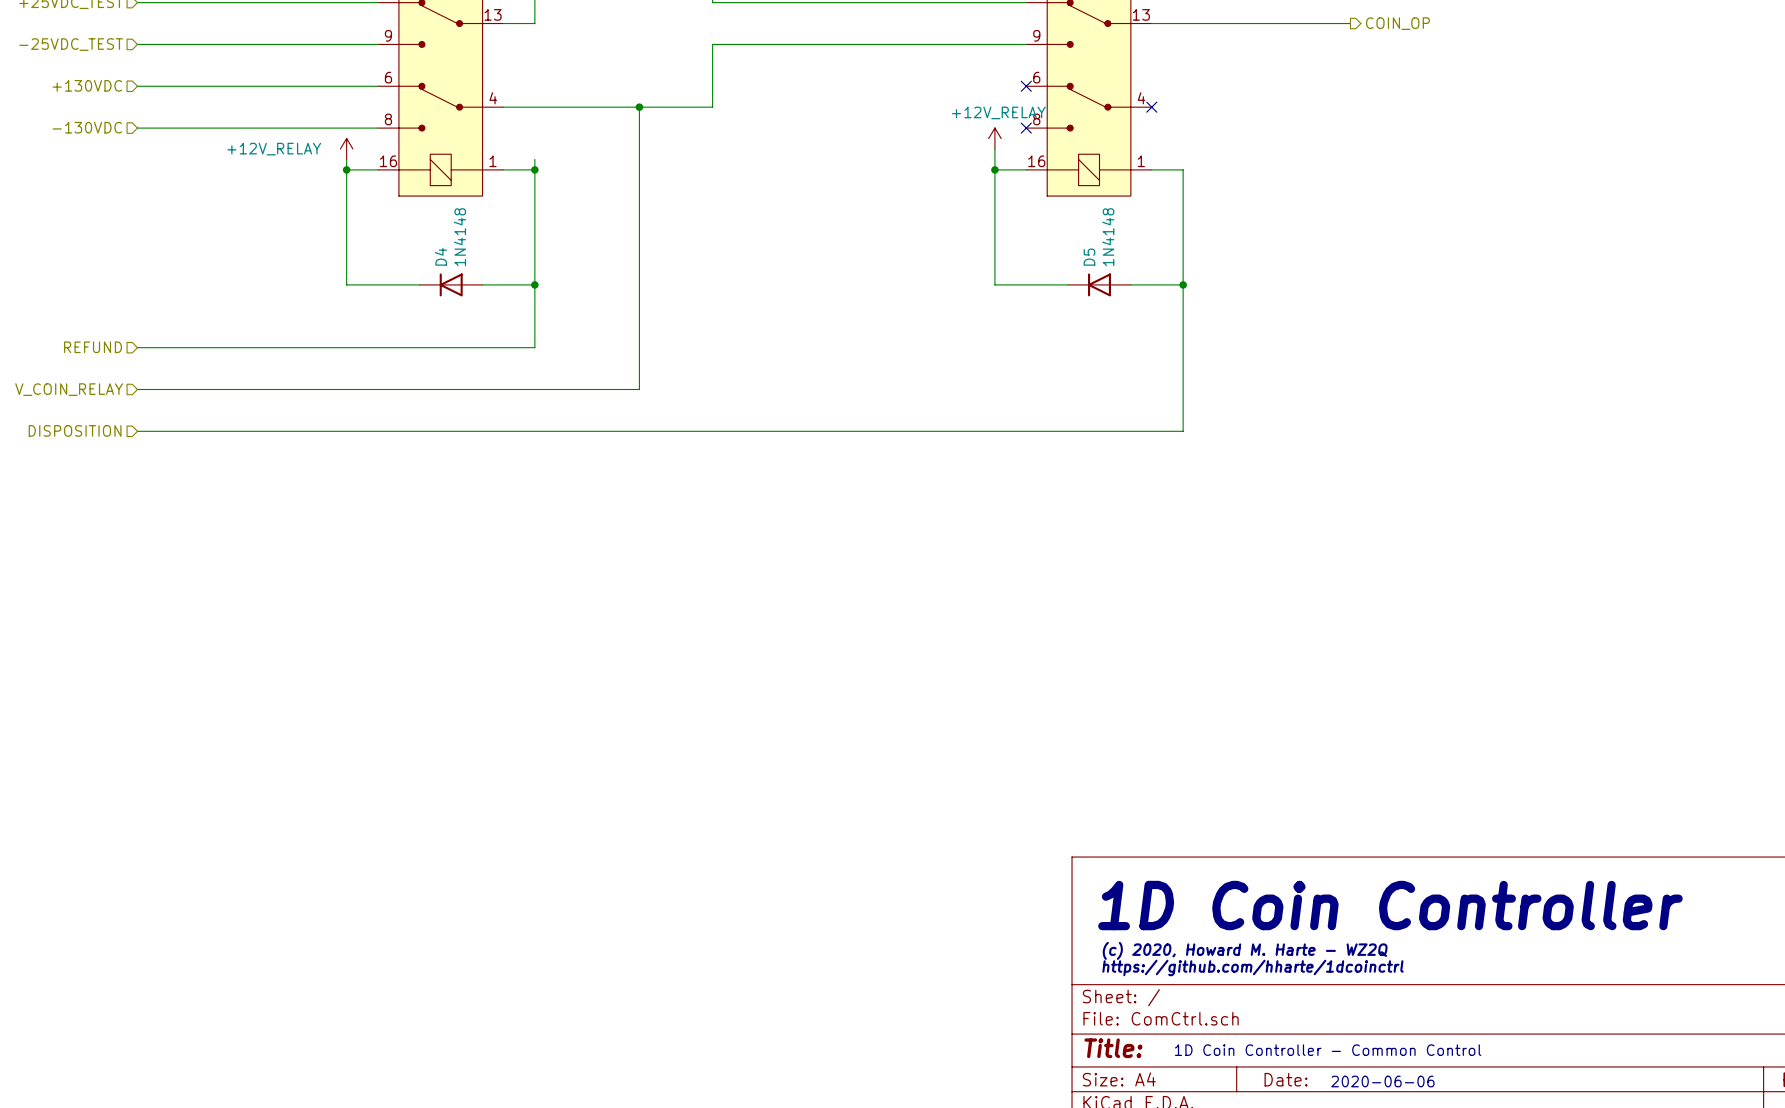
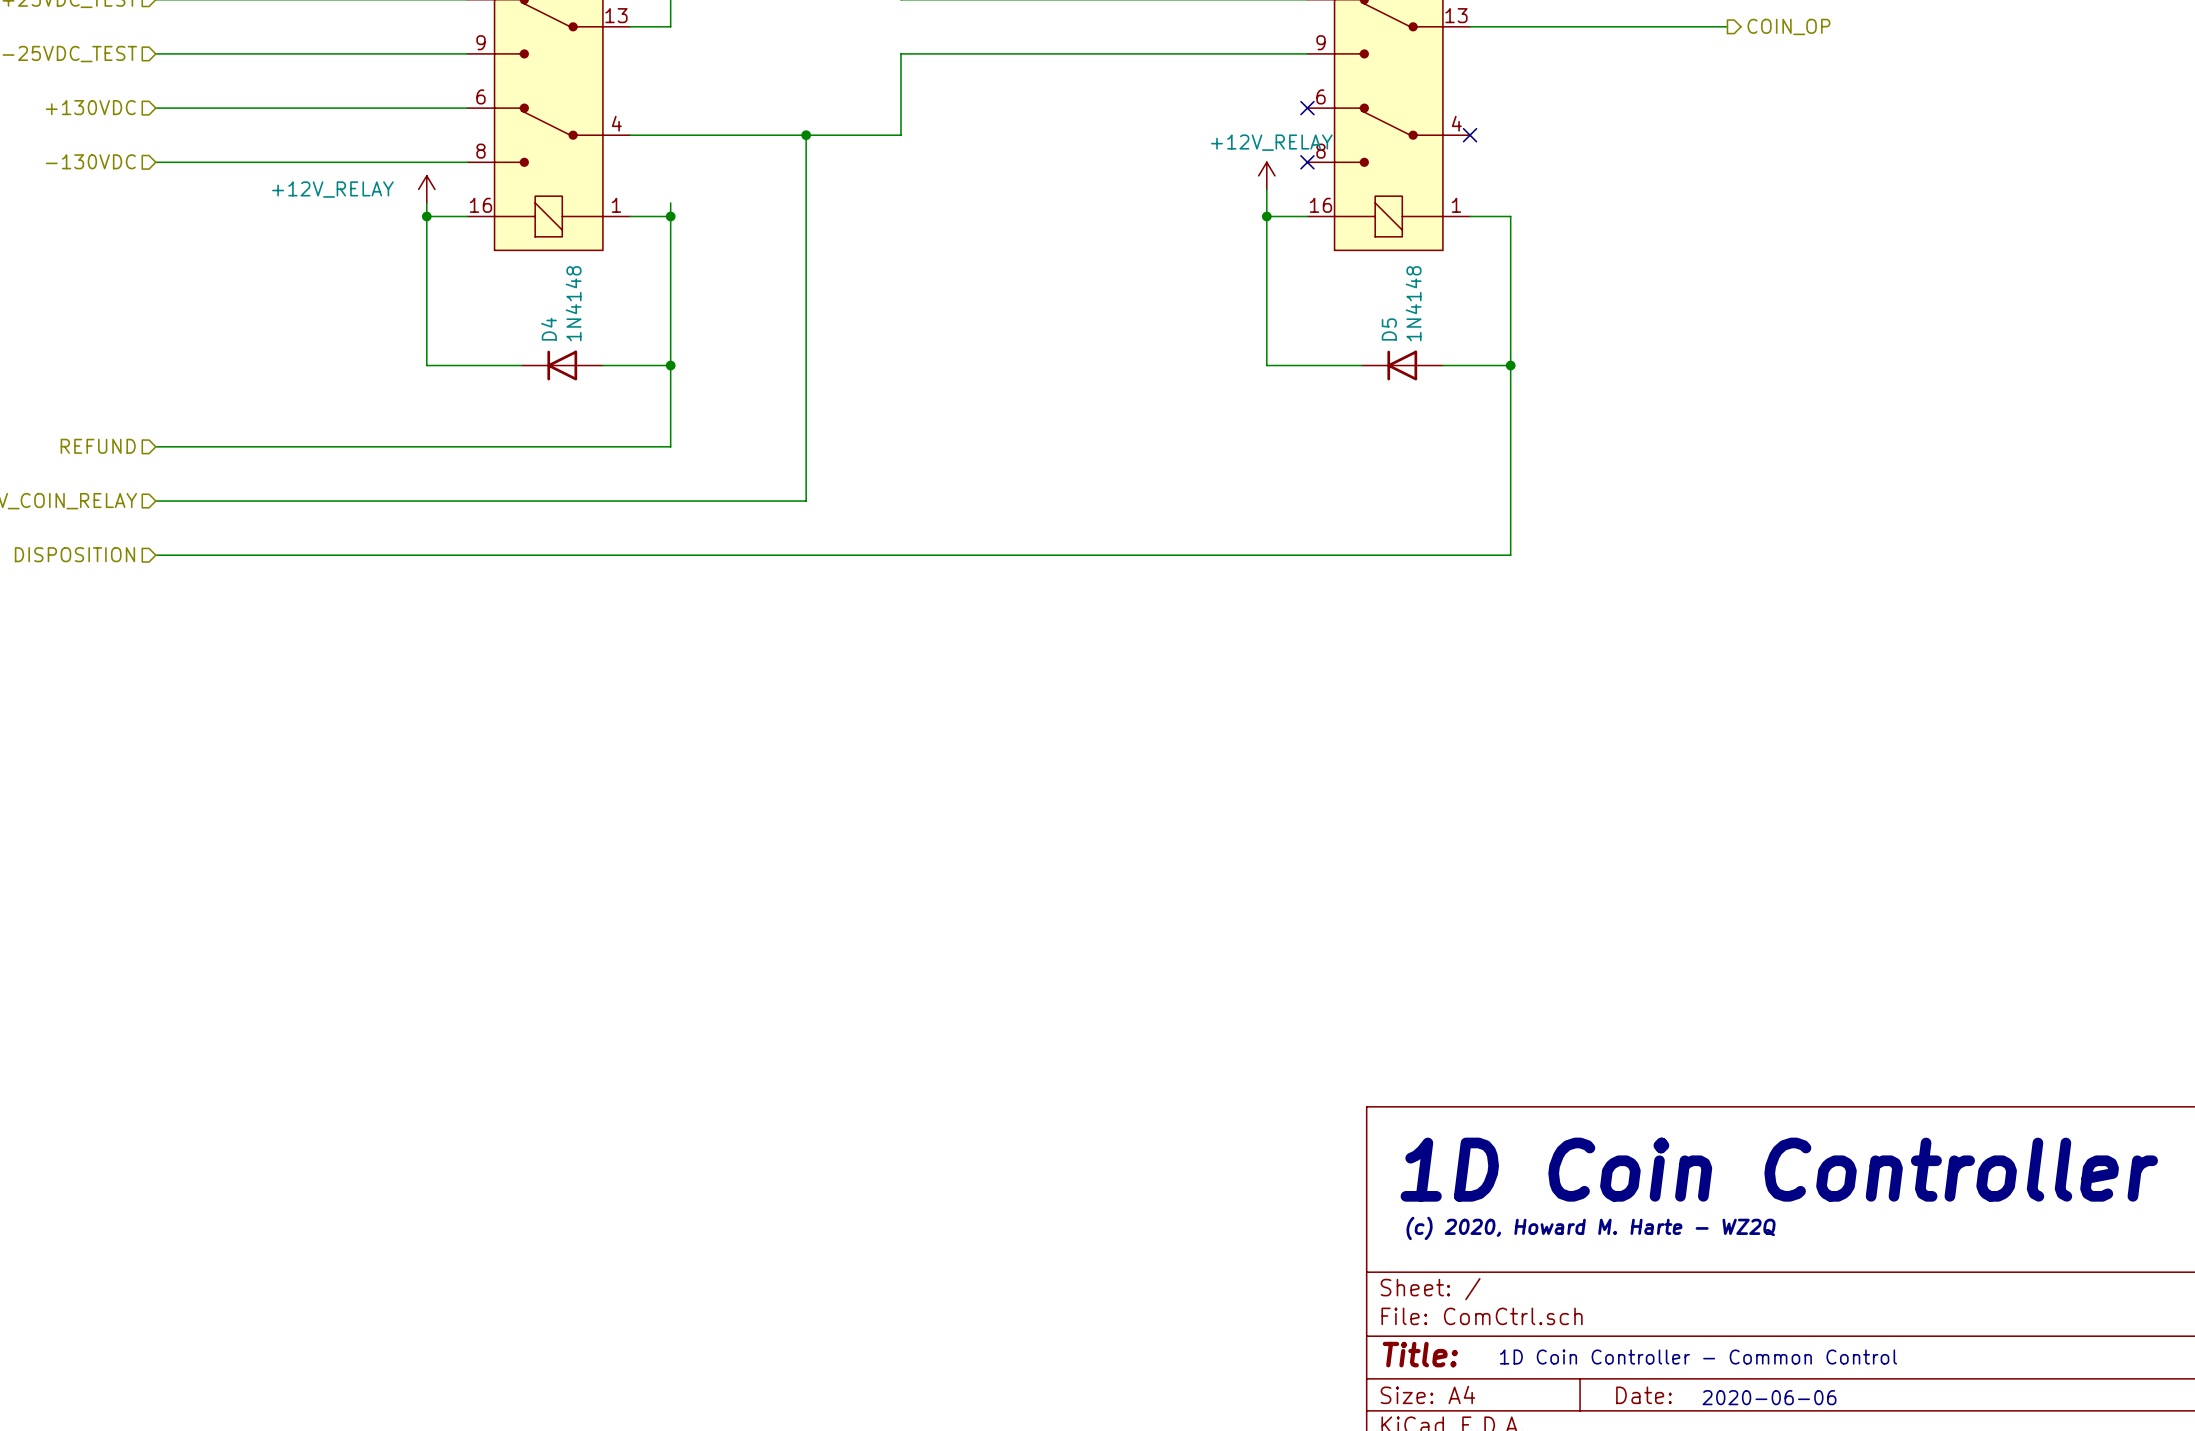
text: https://github.com/hharte/1dcoinctrl (1252, 967) -> none

